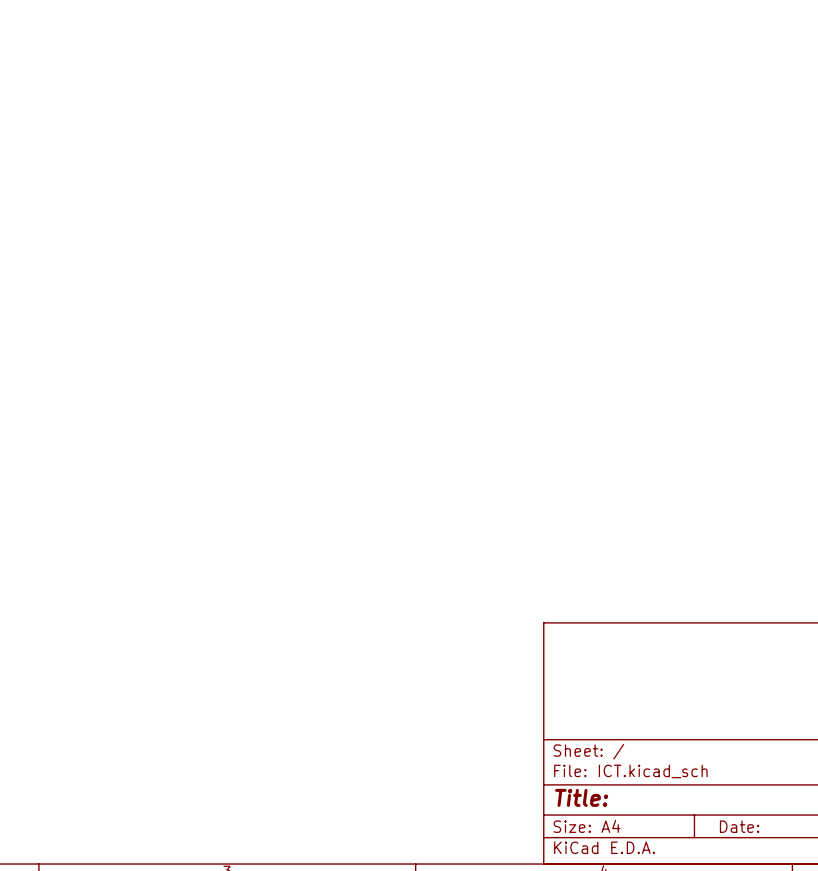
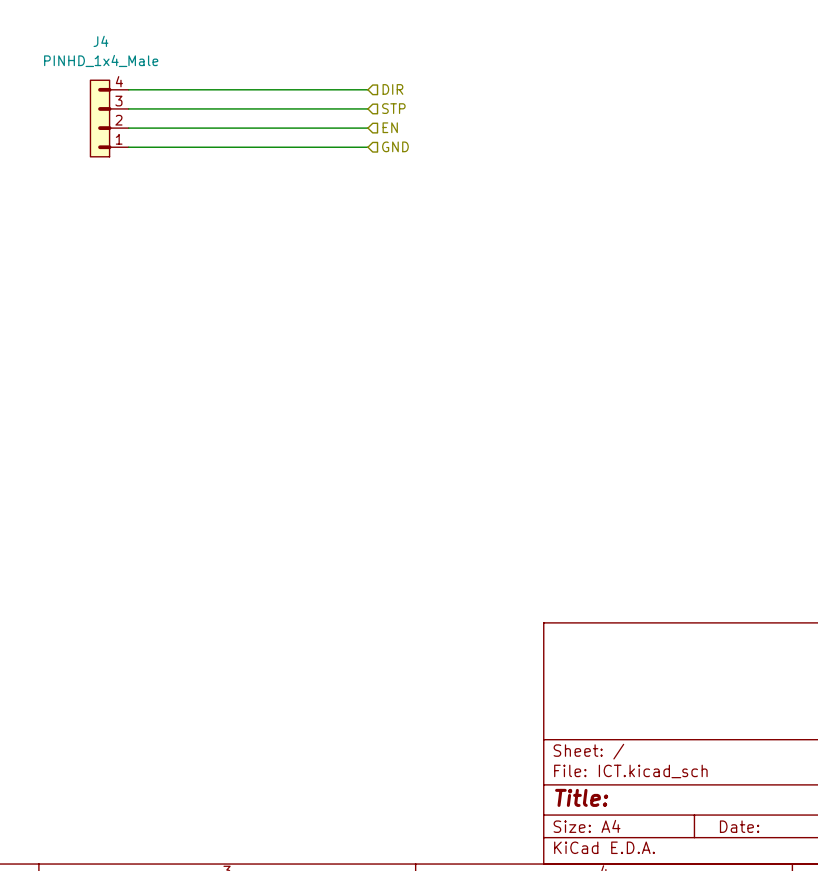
wire: none -> (128, 89) (367, 89)
hierarchical label: none -> DIR (392, 89)
wire: none -> (128, 108) (367, 108)
hierarchical label: none -> STP (393, 108)
J4: none -> PINHD_1x4_Male (109, 118)
hierarchical label: none -> EN (390, 127)
wire: none -> (128, 128) (367, 128)
hierarchical label: none -> GND (395, 146)
wire: none -> (128, 147) (367, 147)

